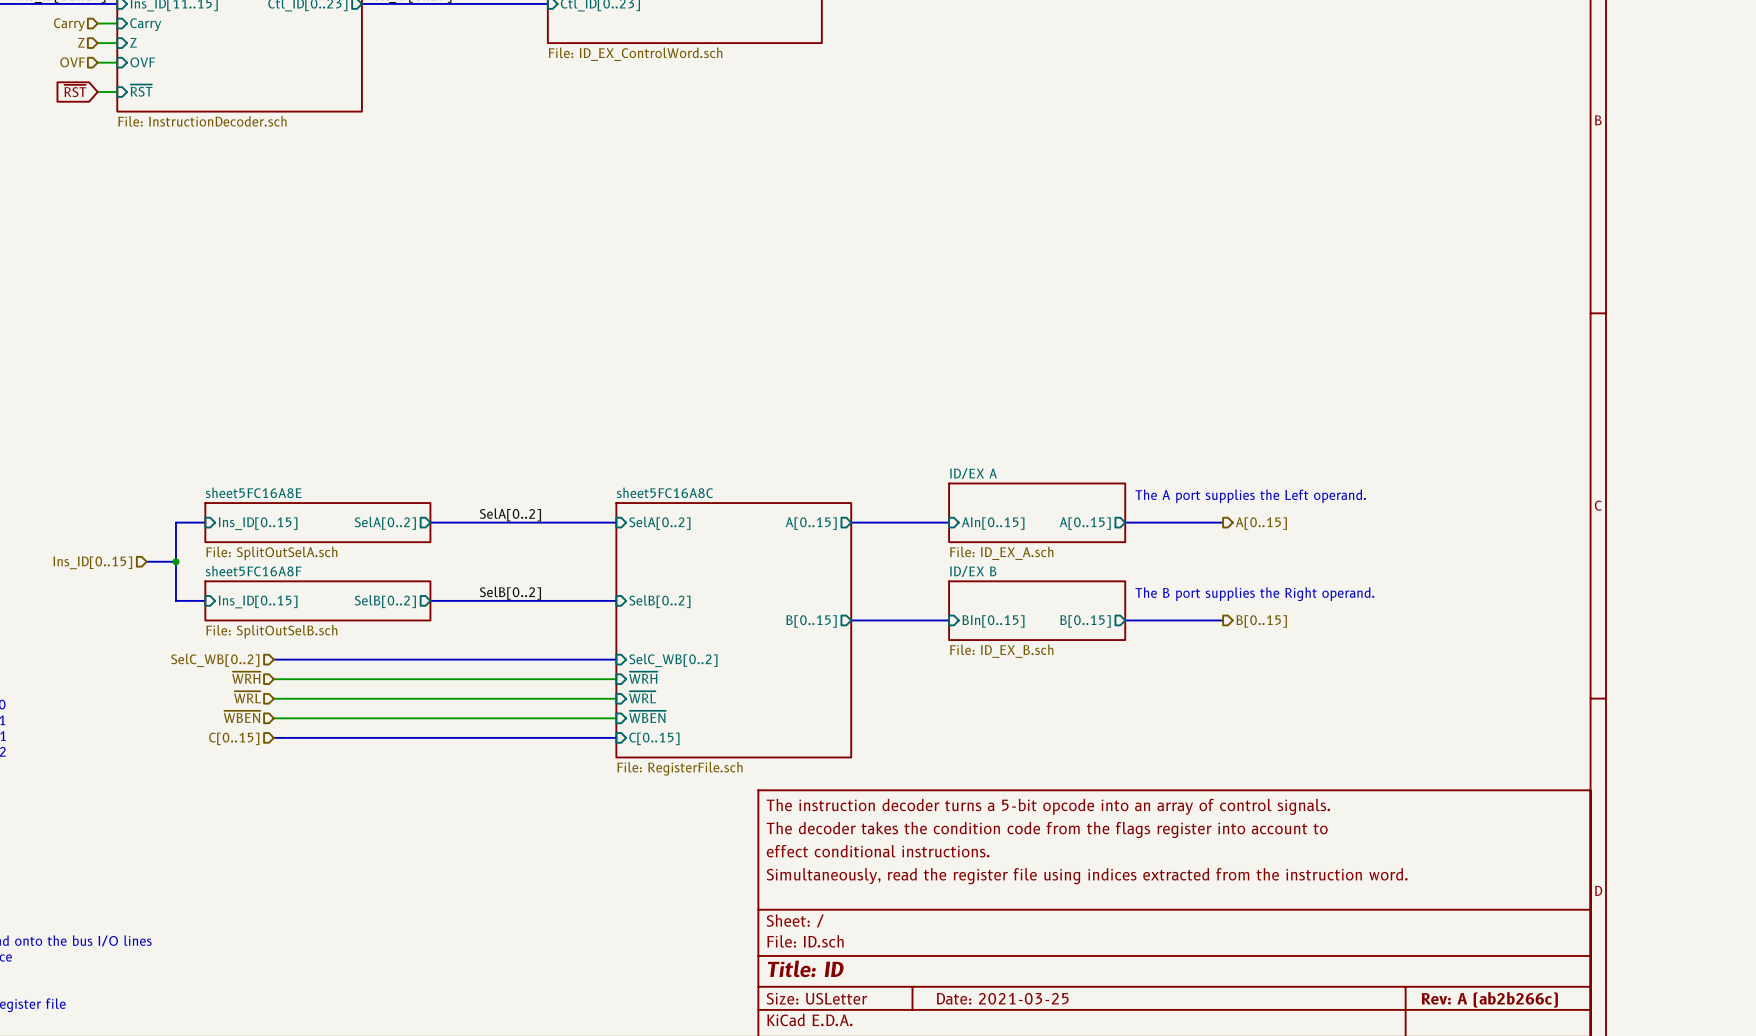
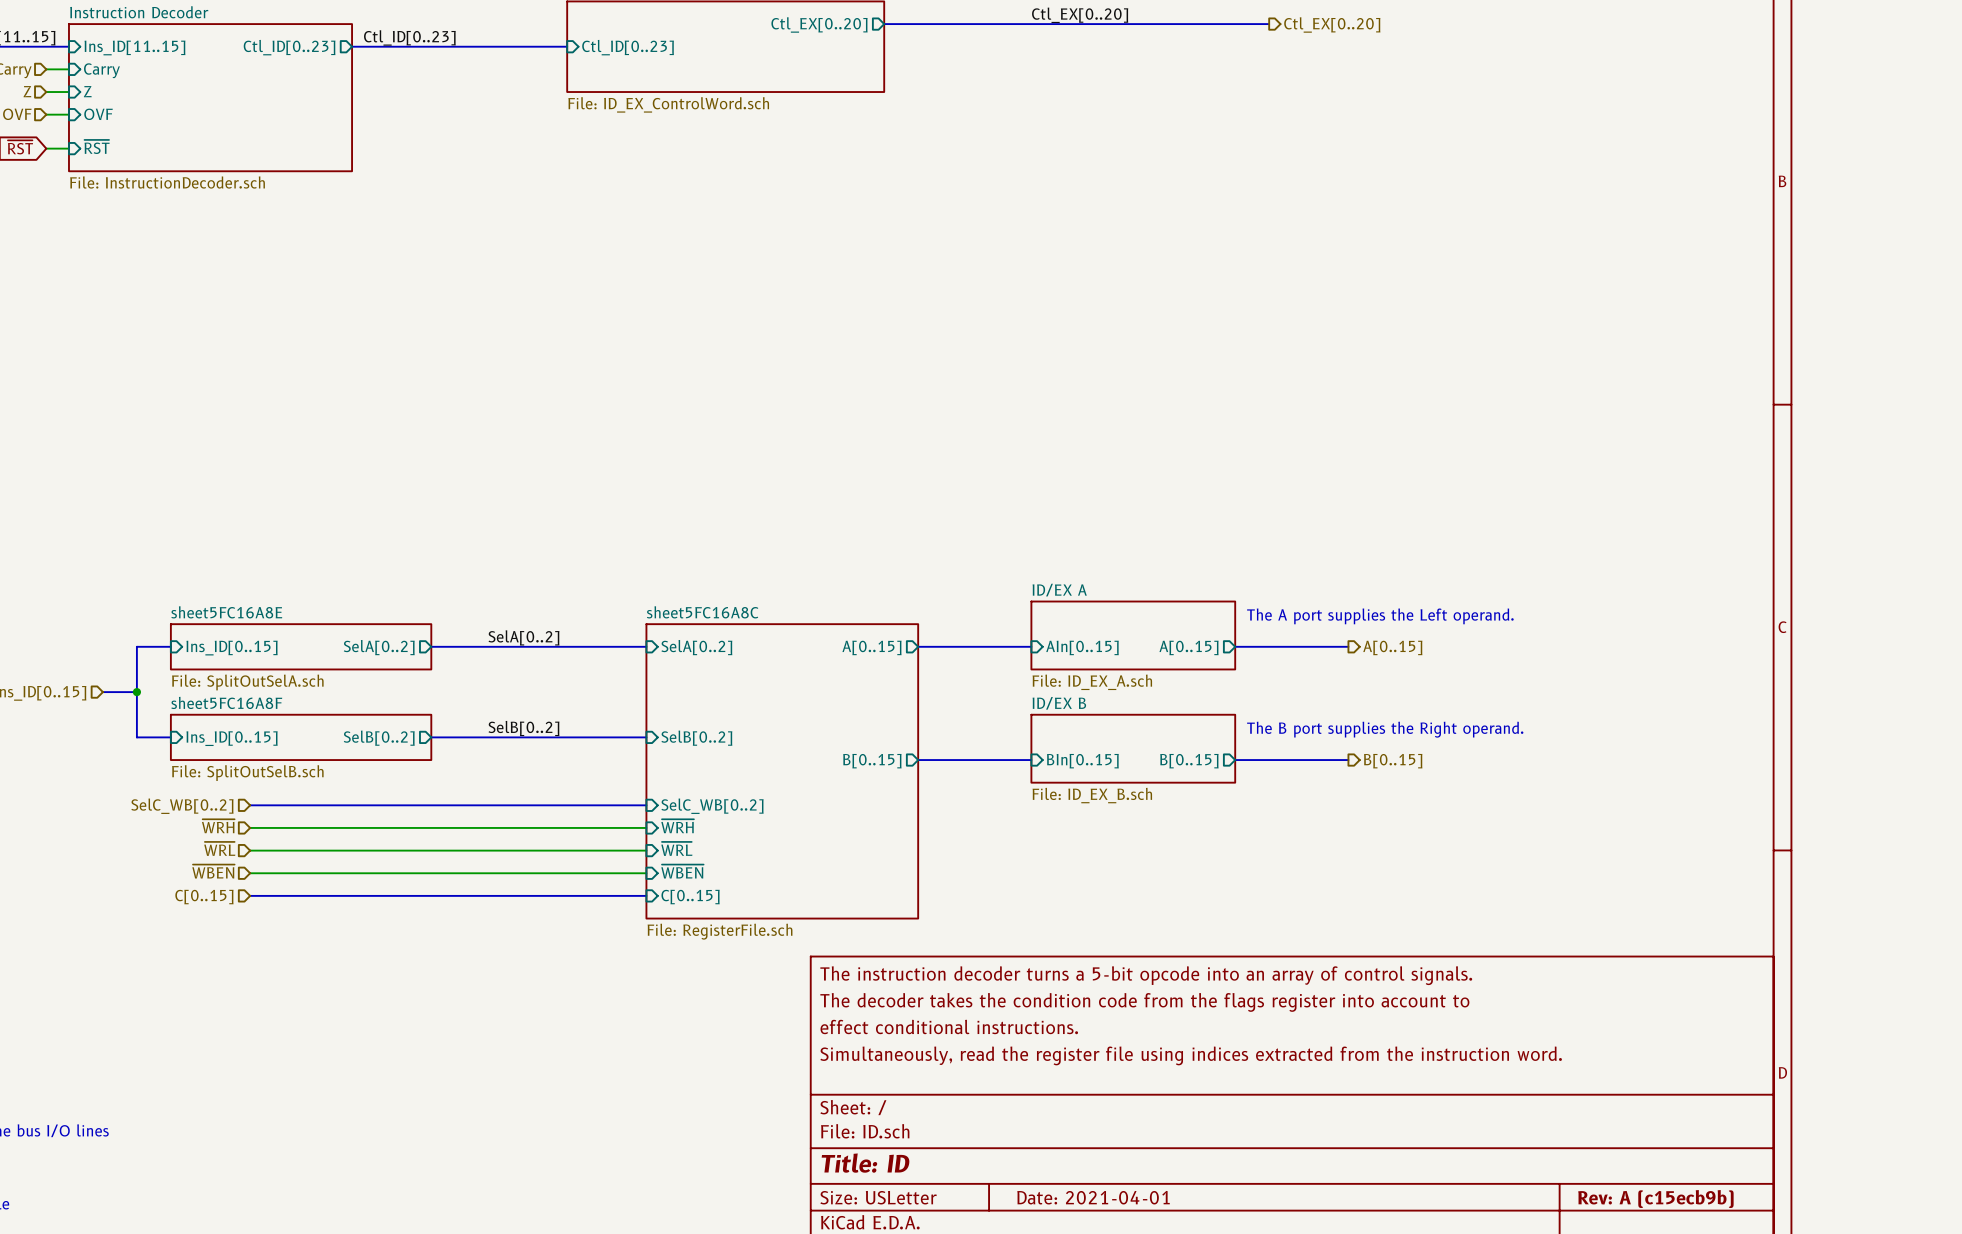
title block: Date: 2021-03-25 (1002, 998) -> Date: 2021-04-01 (1093, 1197)
title block: Rev: A (ab2b266c) (1489, 999) -> Rev: A (c15ecb9b) (1655, 1199)

